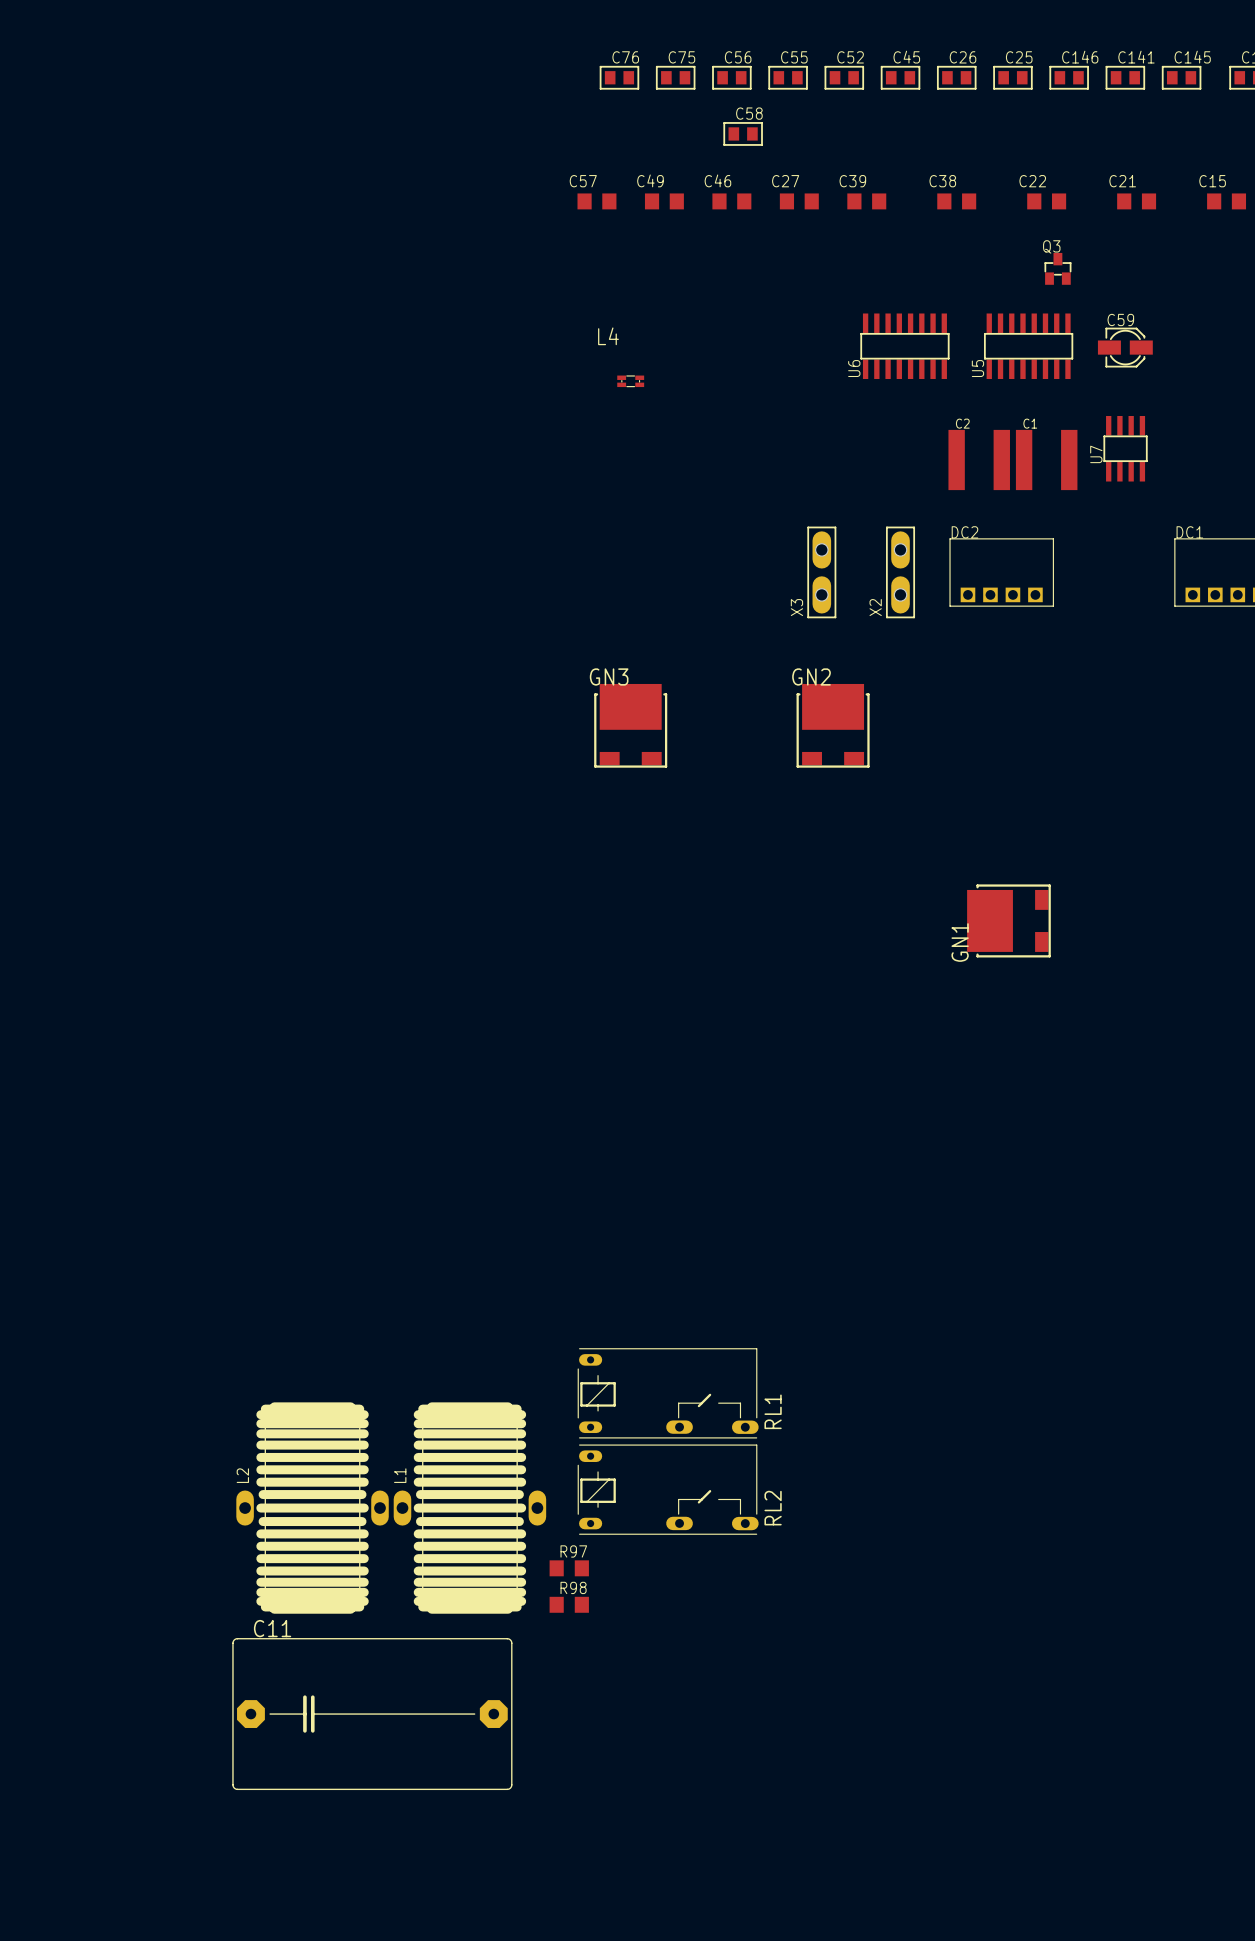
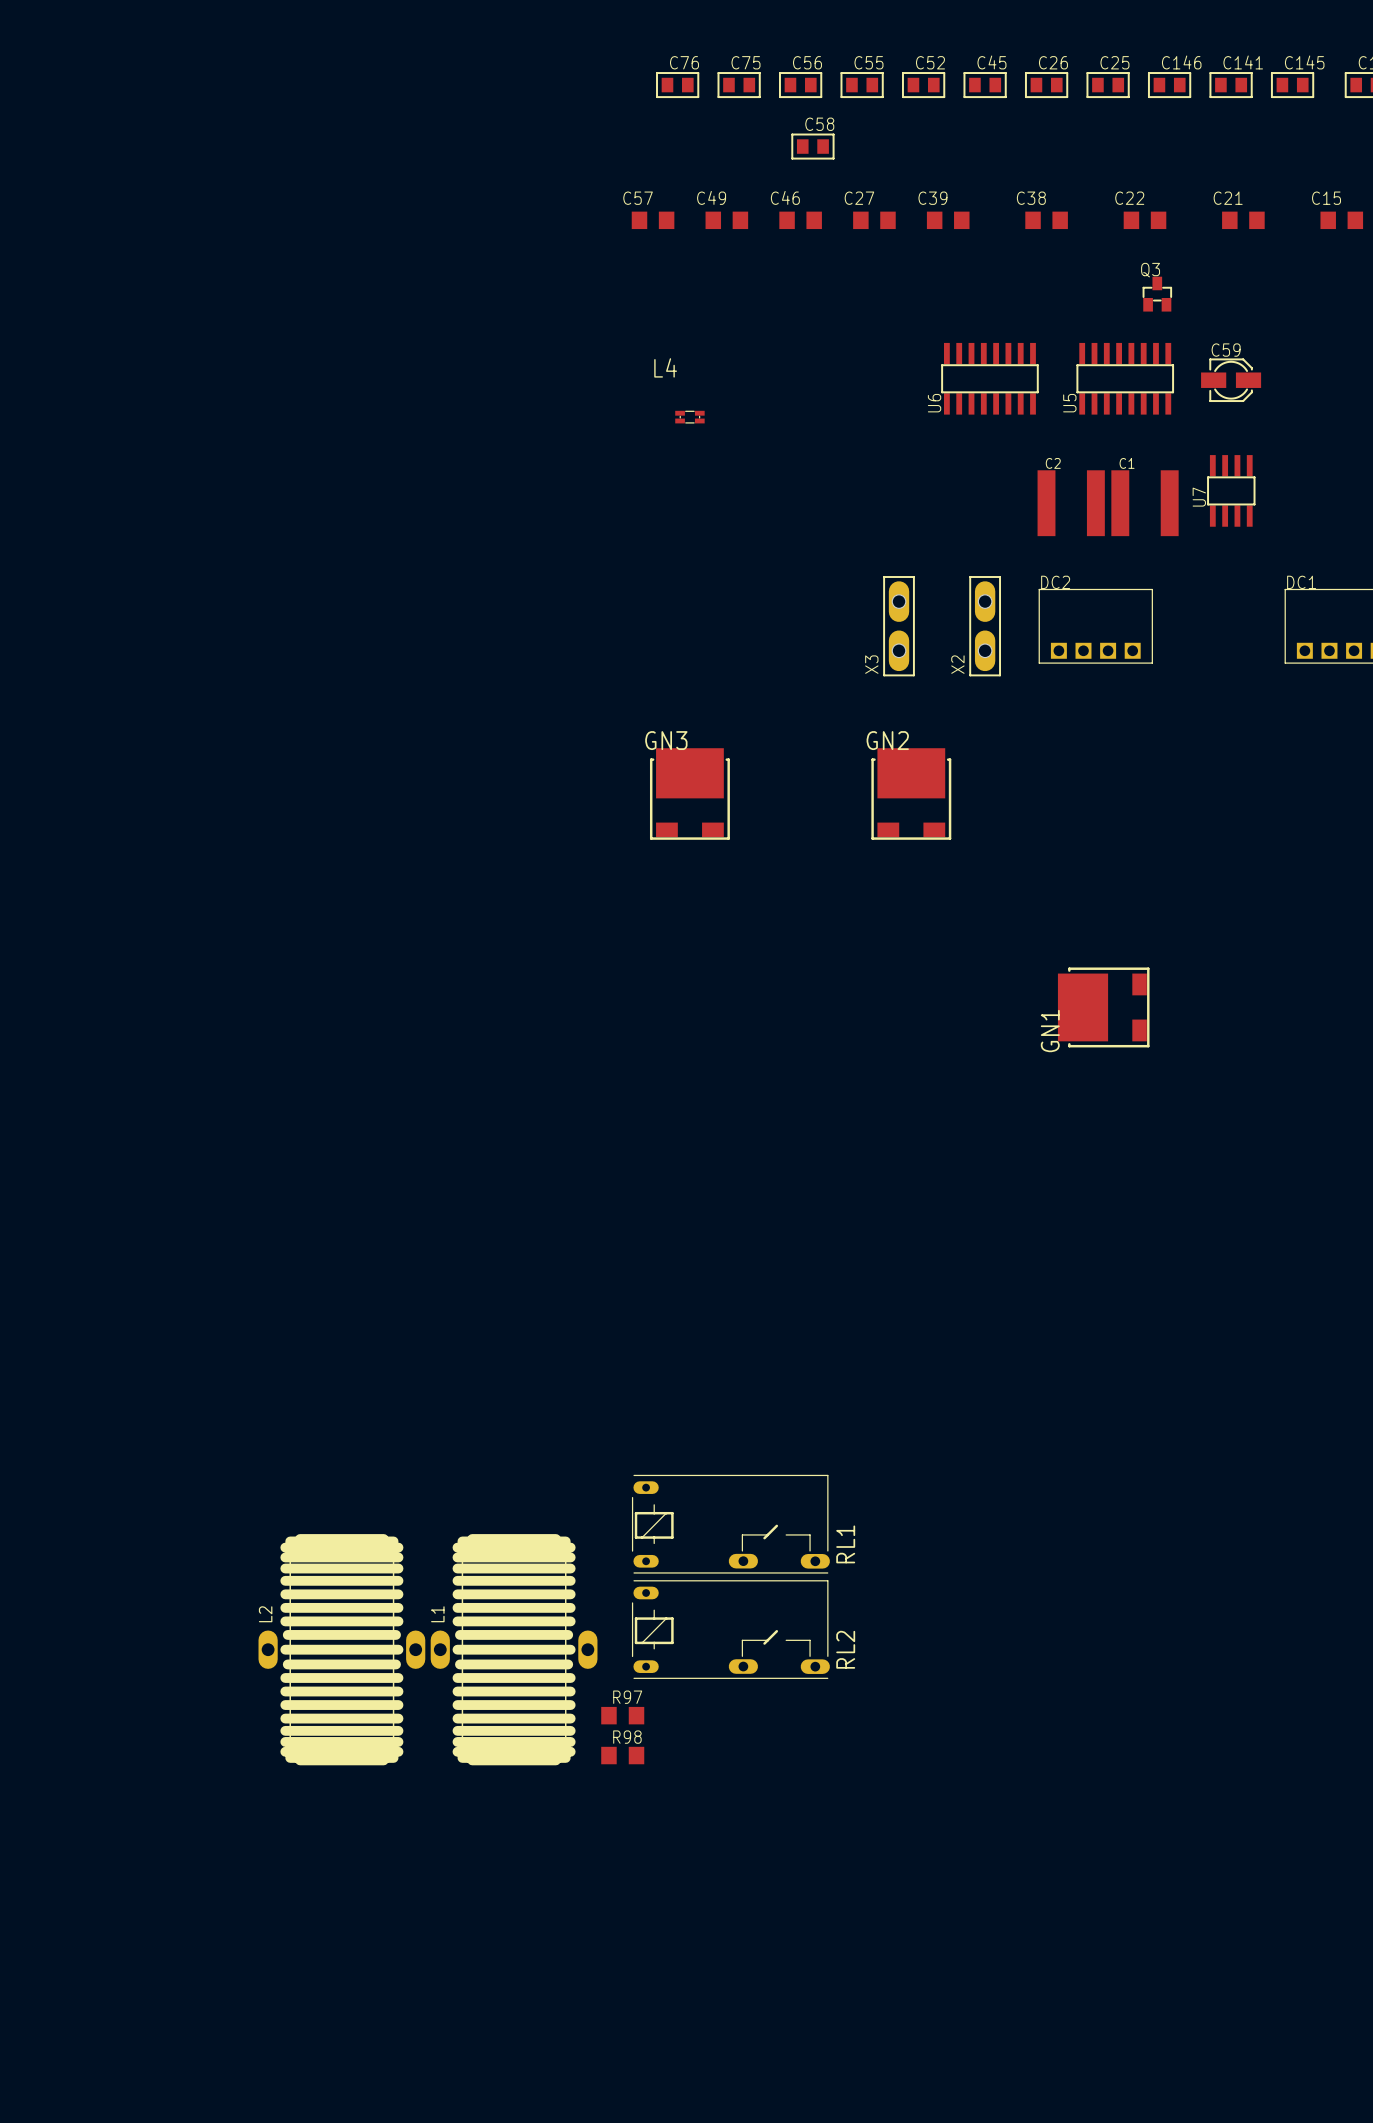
C11: (372, 1714) -> none

